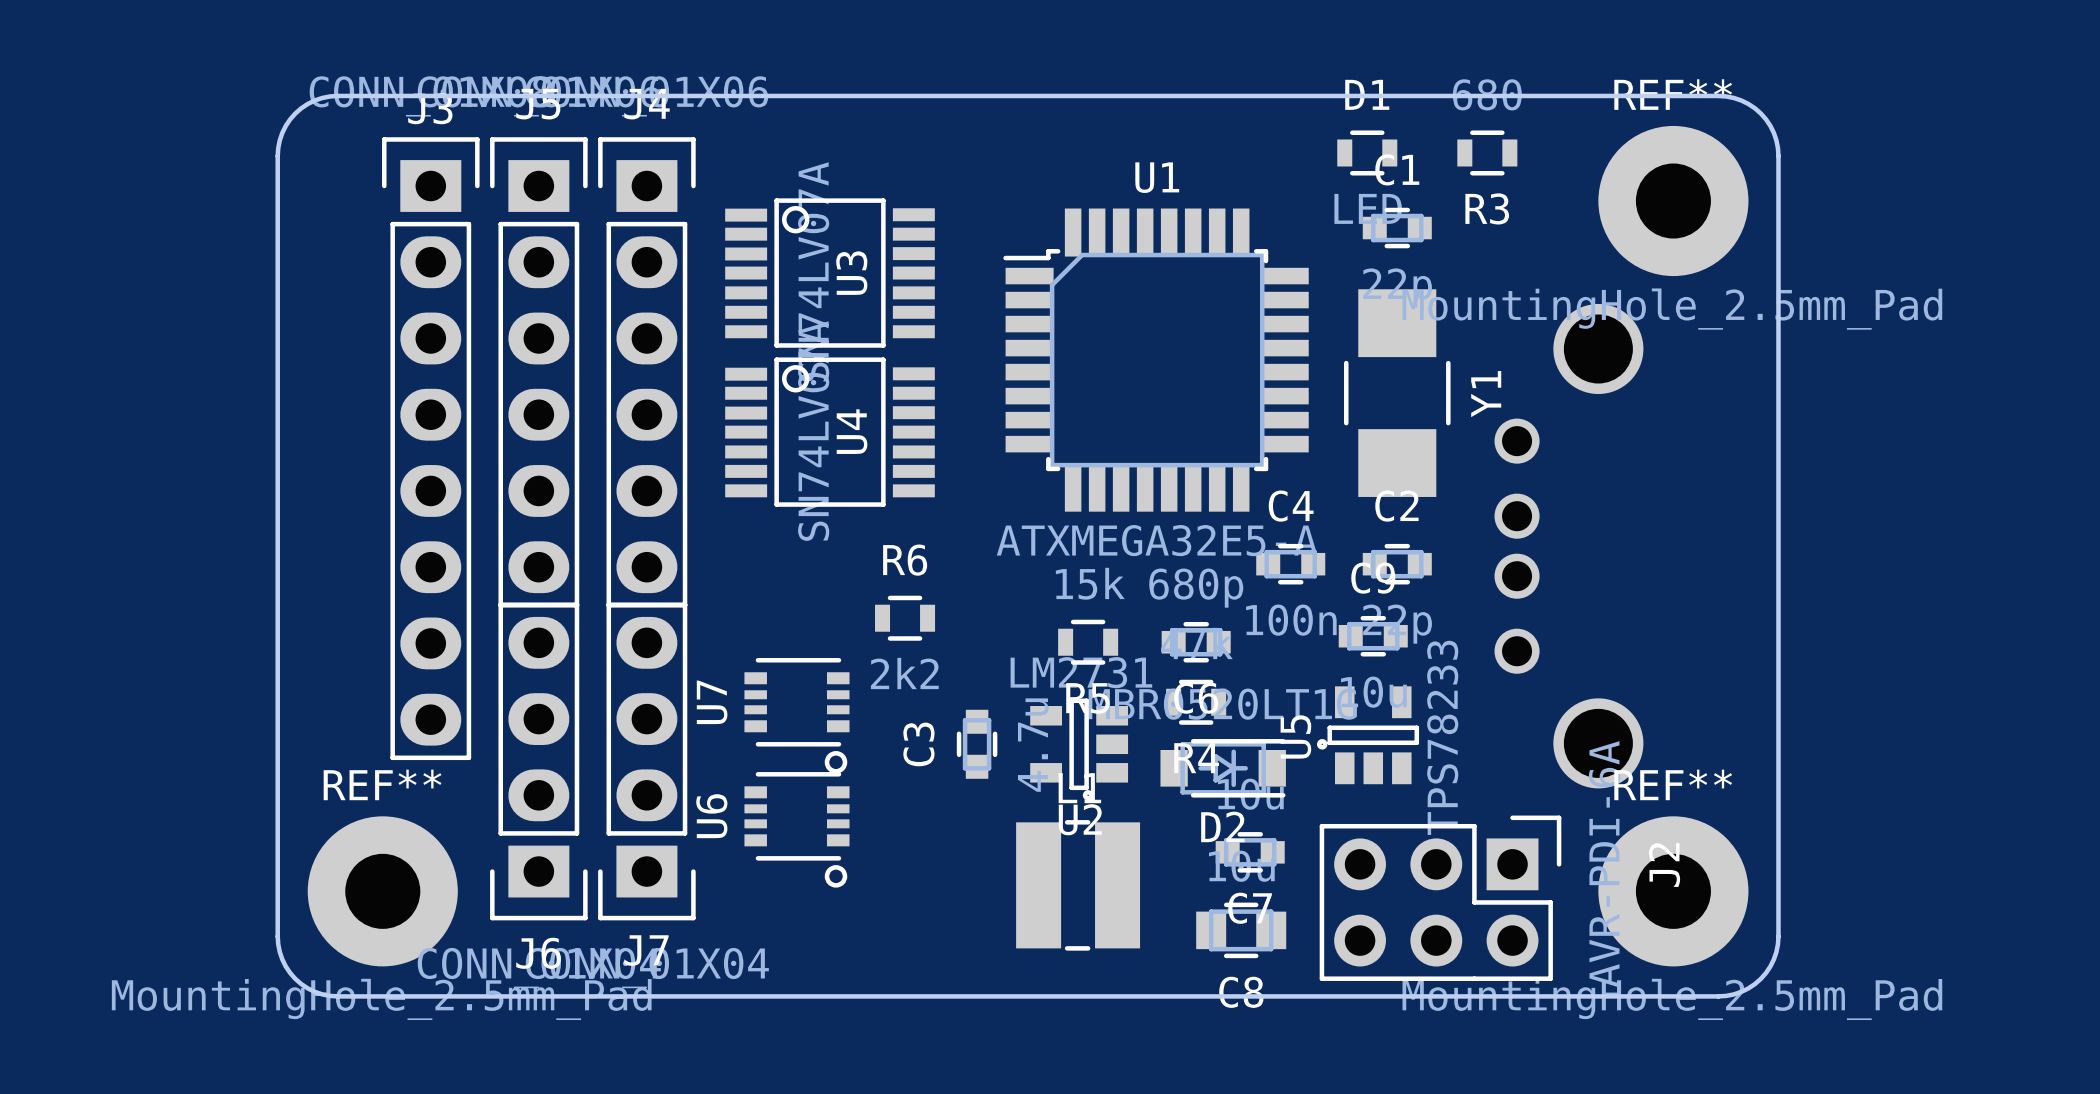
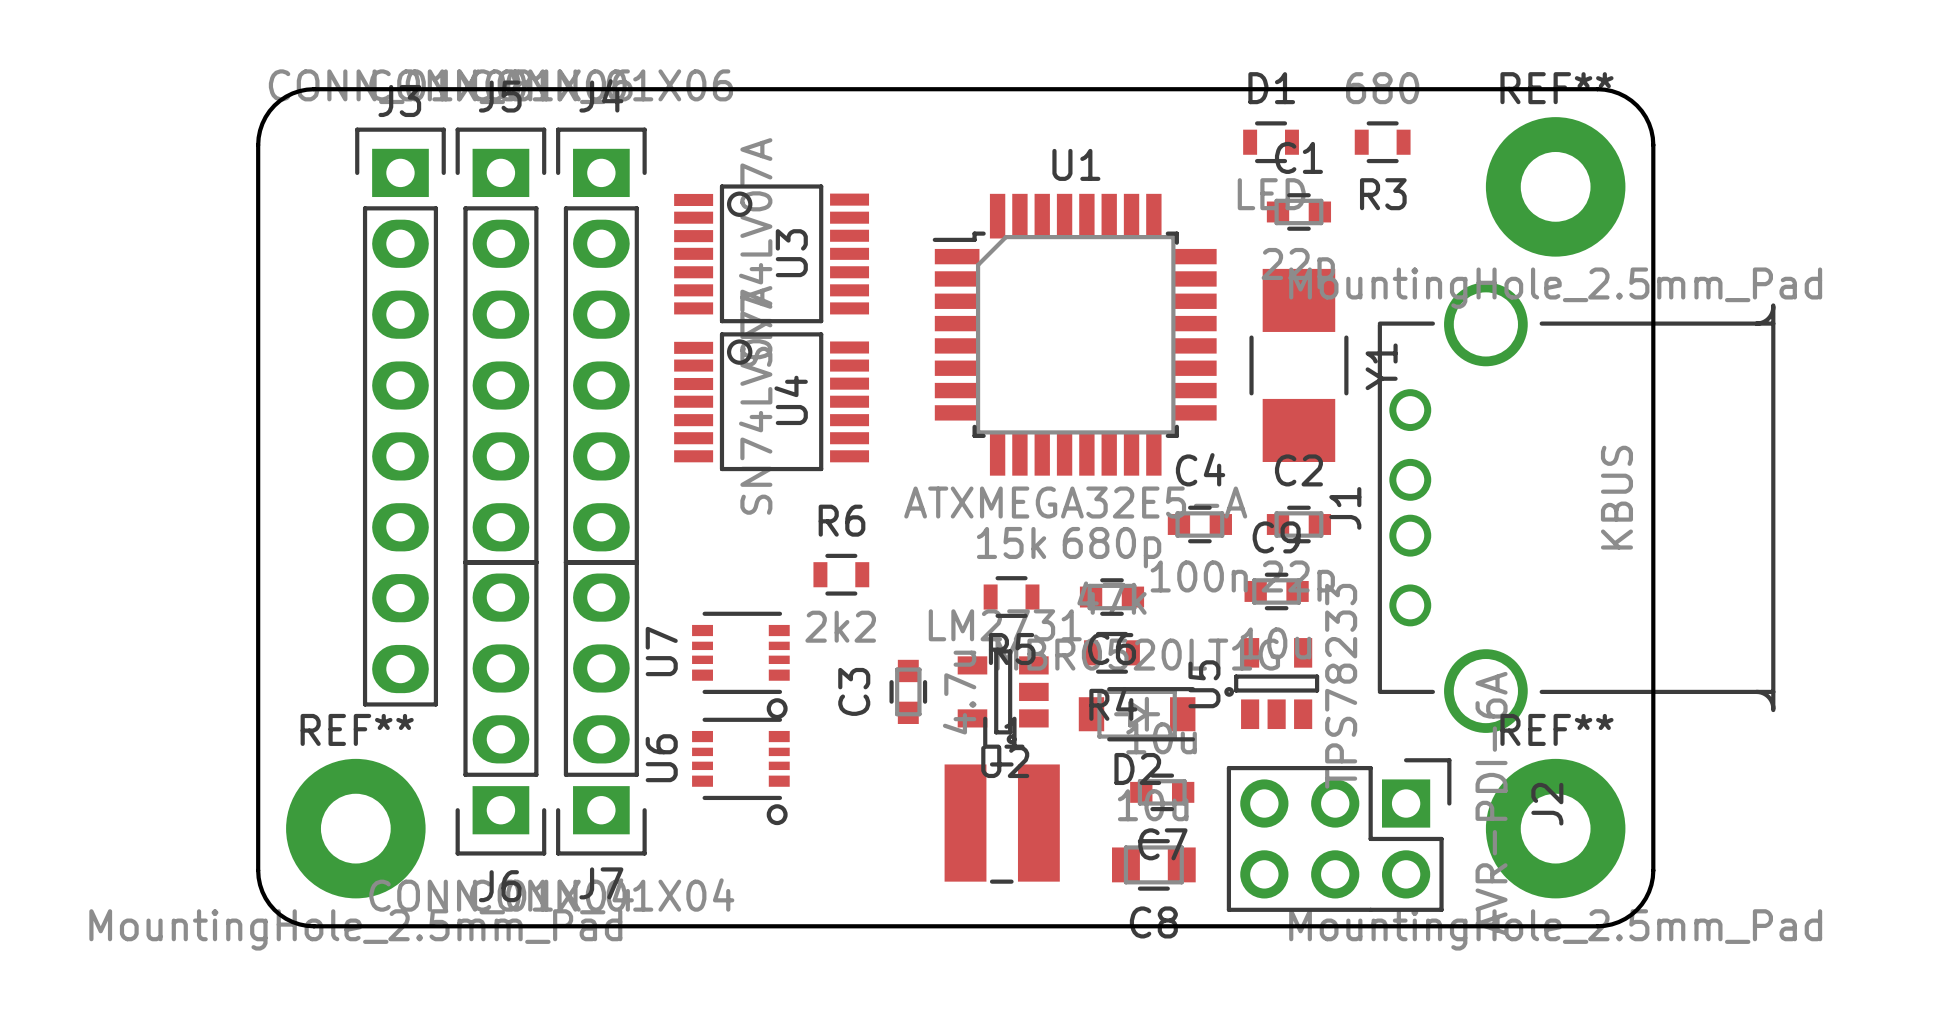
J1 side: bottom (1568, 546) -> top (1576, 507)

